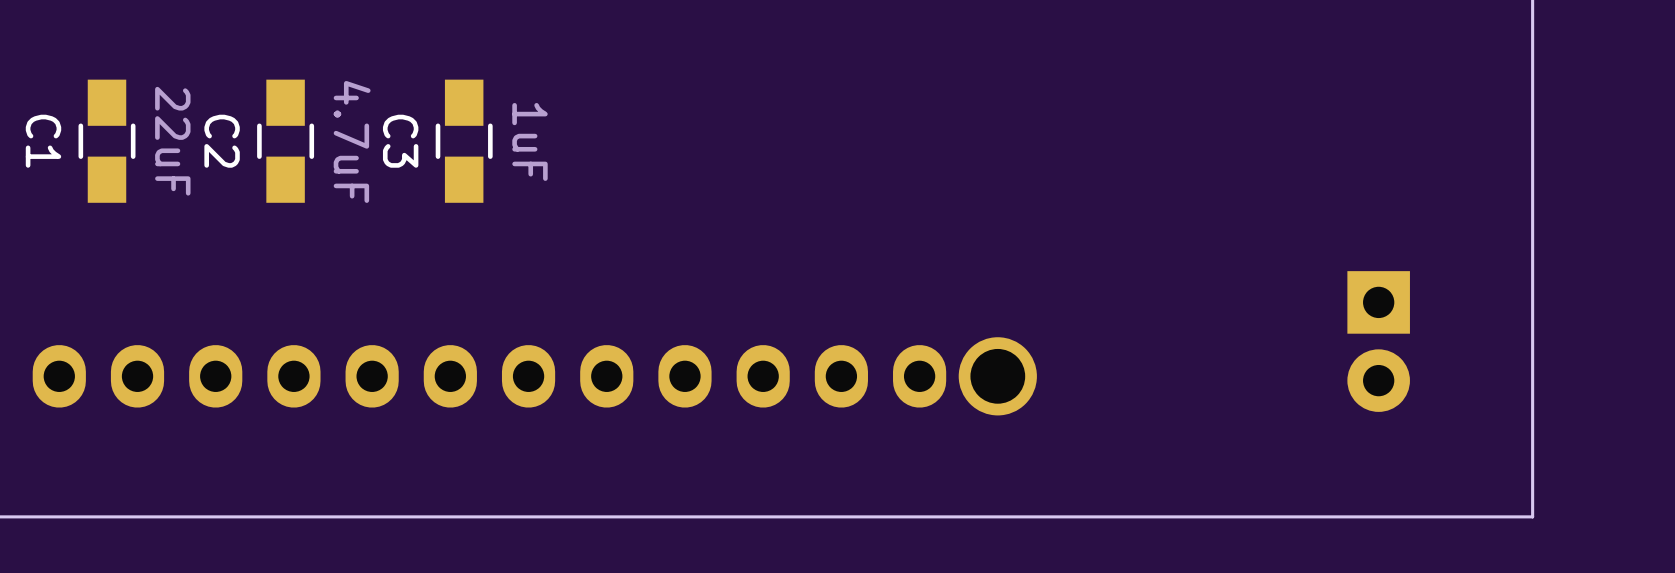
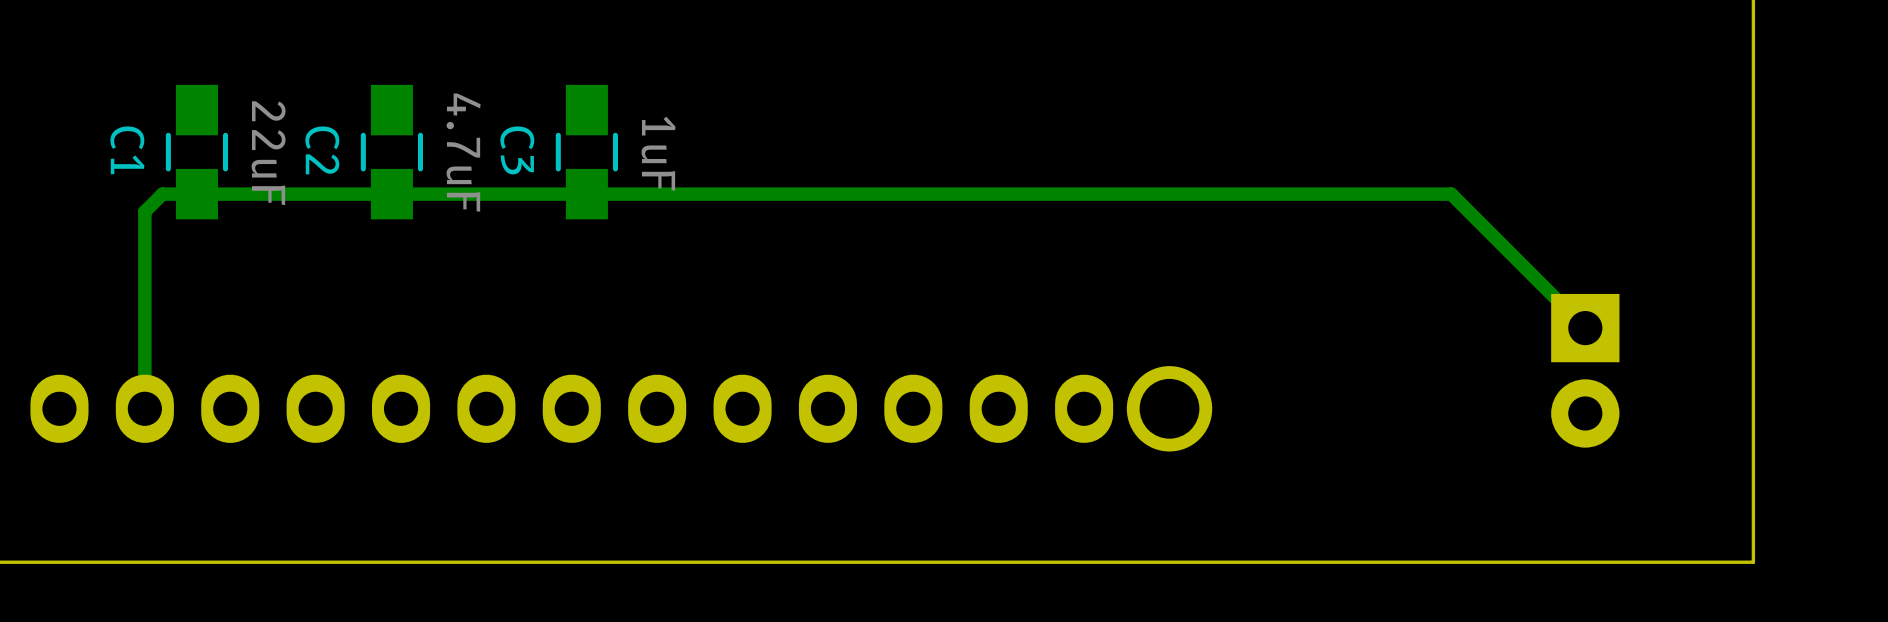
track: none -> (1585, 328) (1451, 194) (162, 194) (144, 211) (144, 408)

